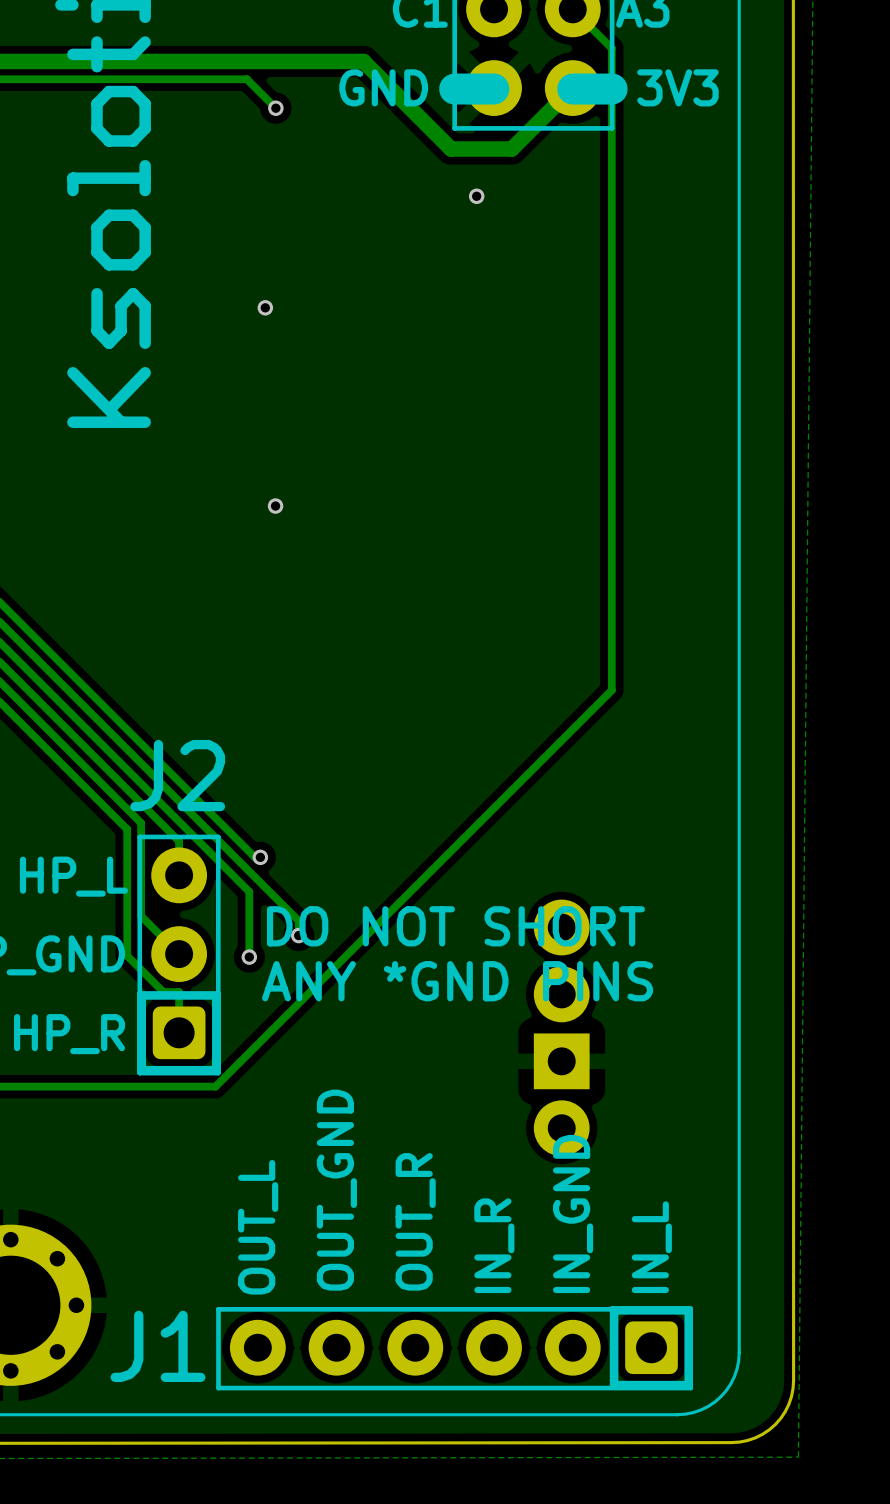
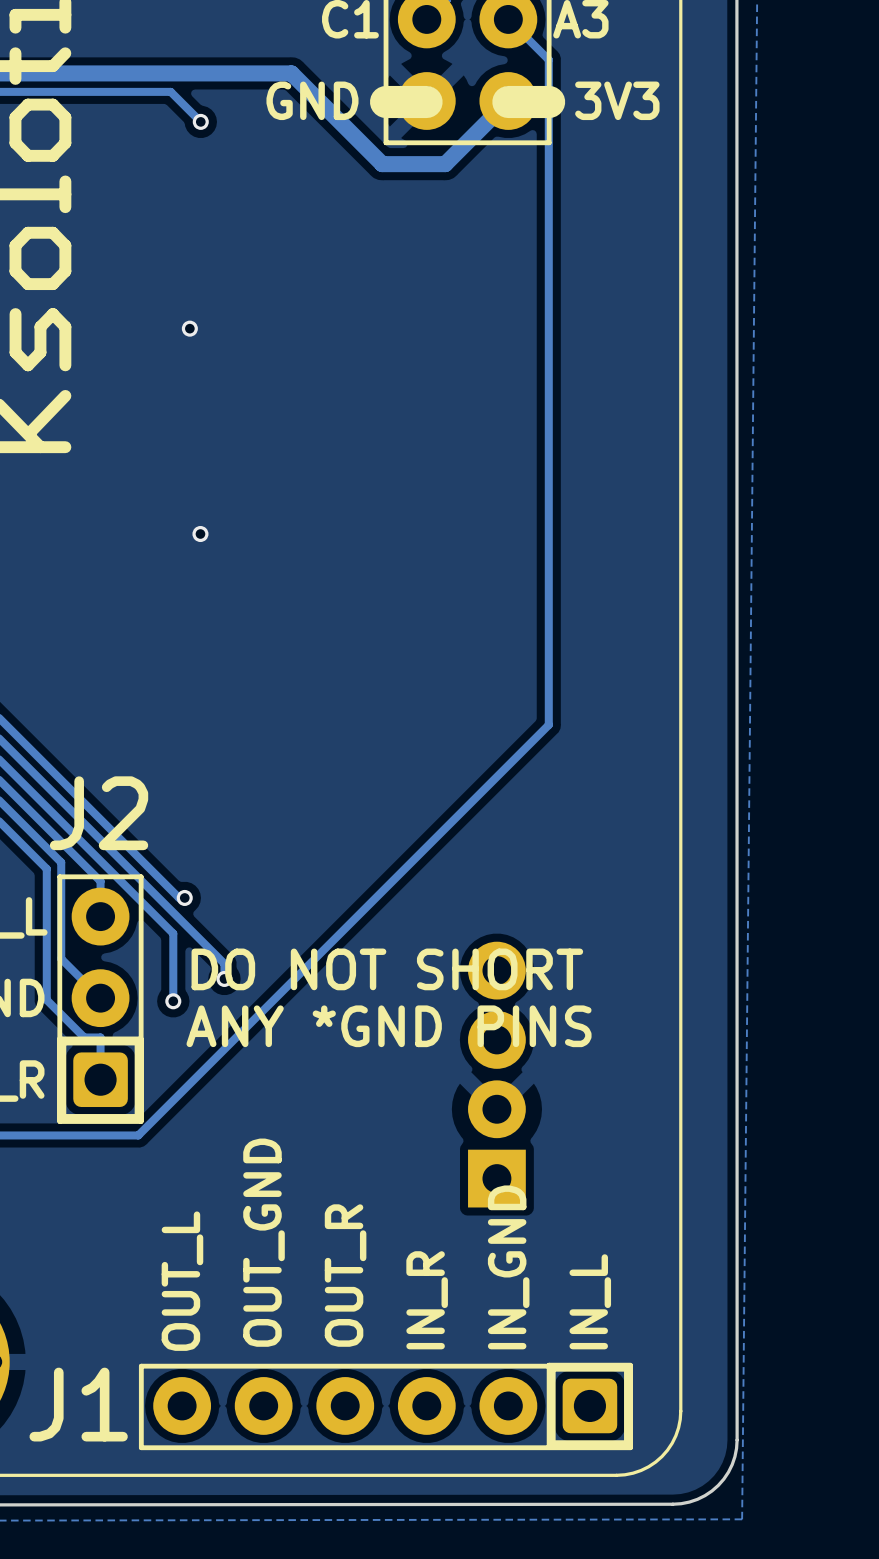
via: (476, 196) -> none
part footprint: [533, 899, 590, 1157] -> [468, 941, 526, 1208]

